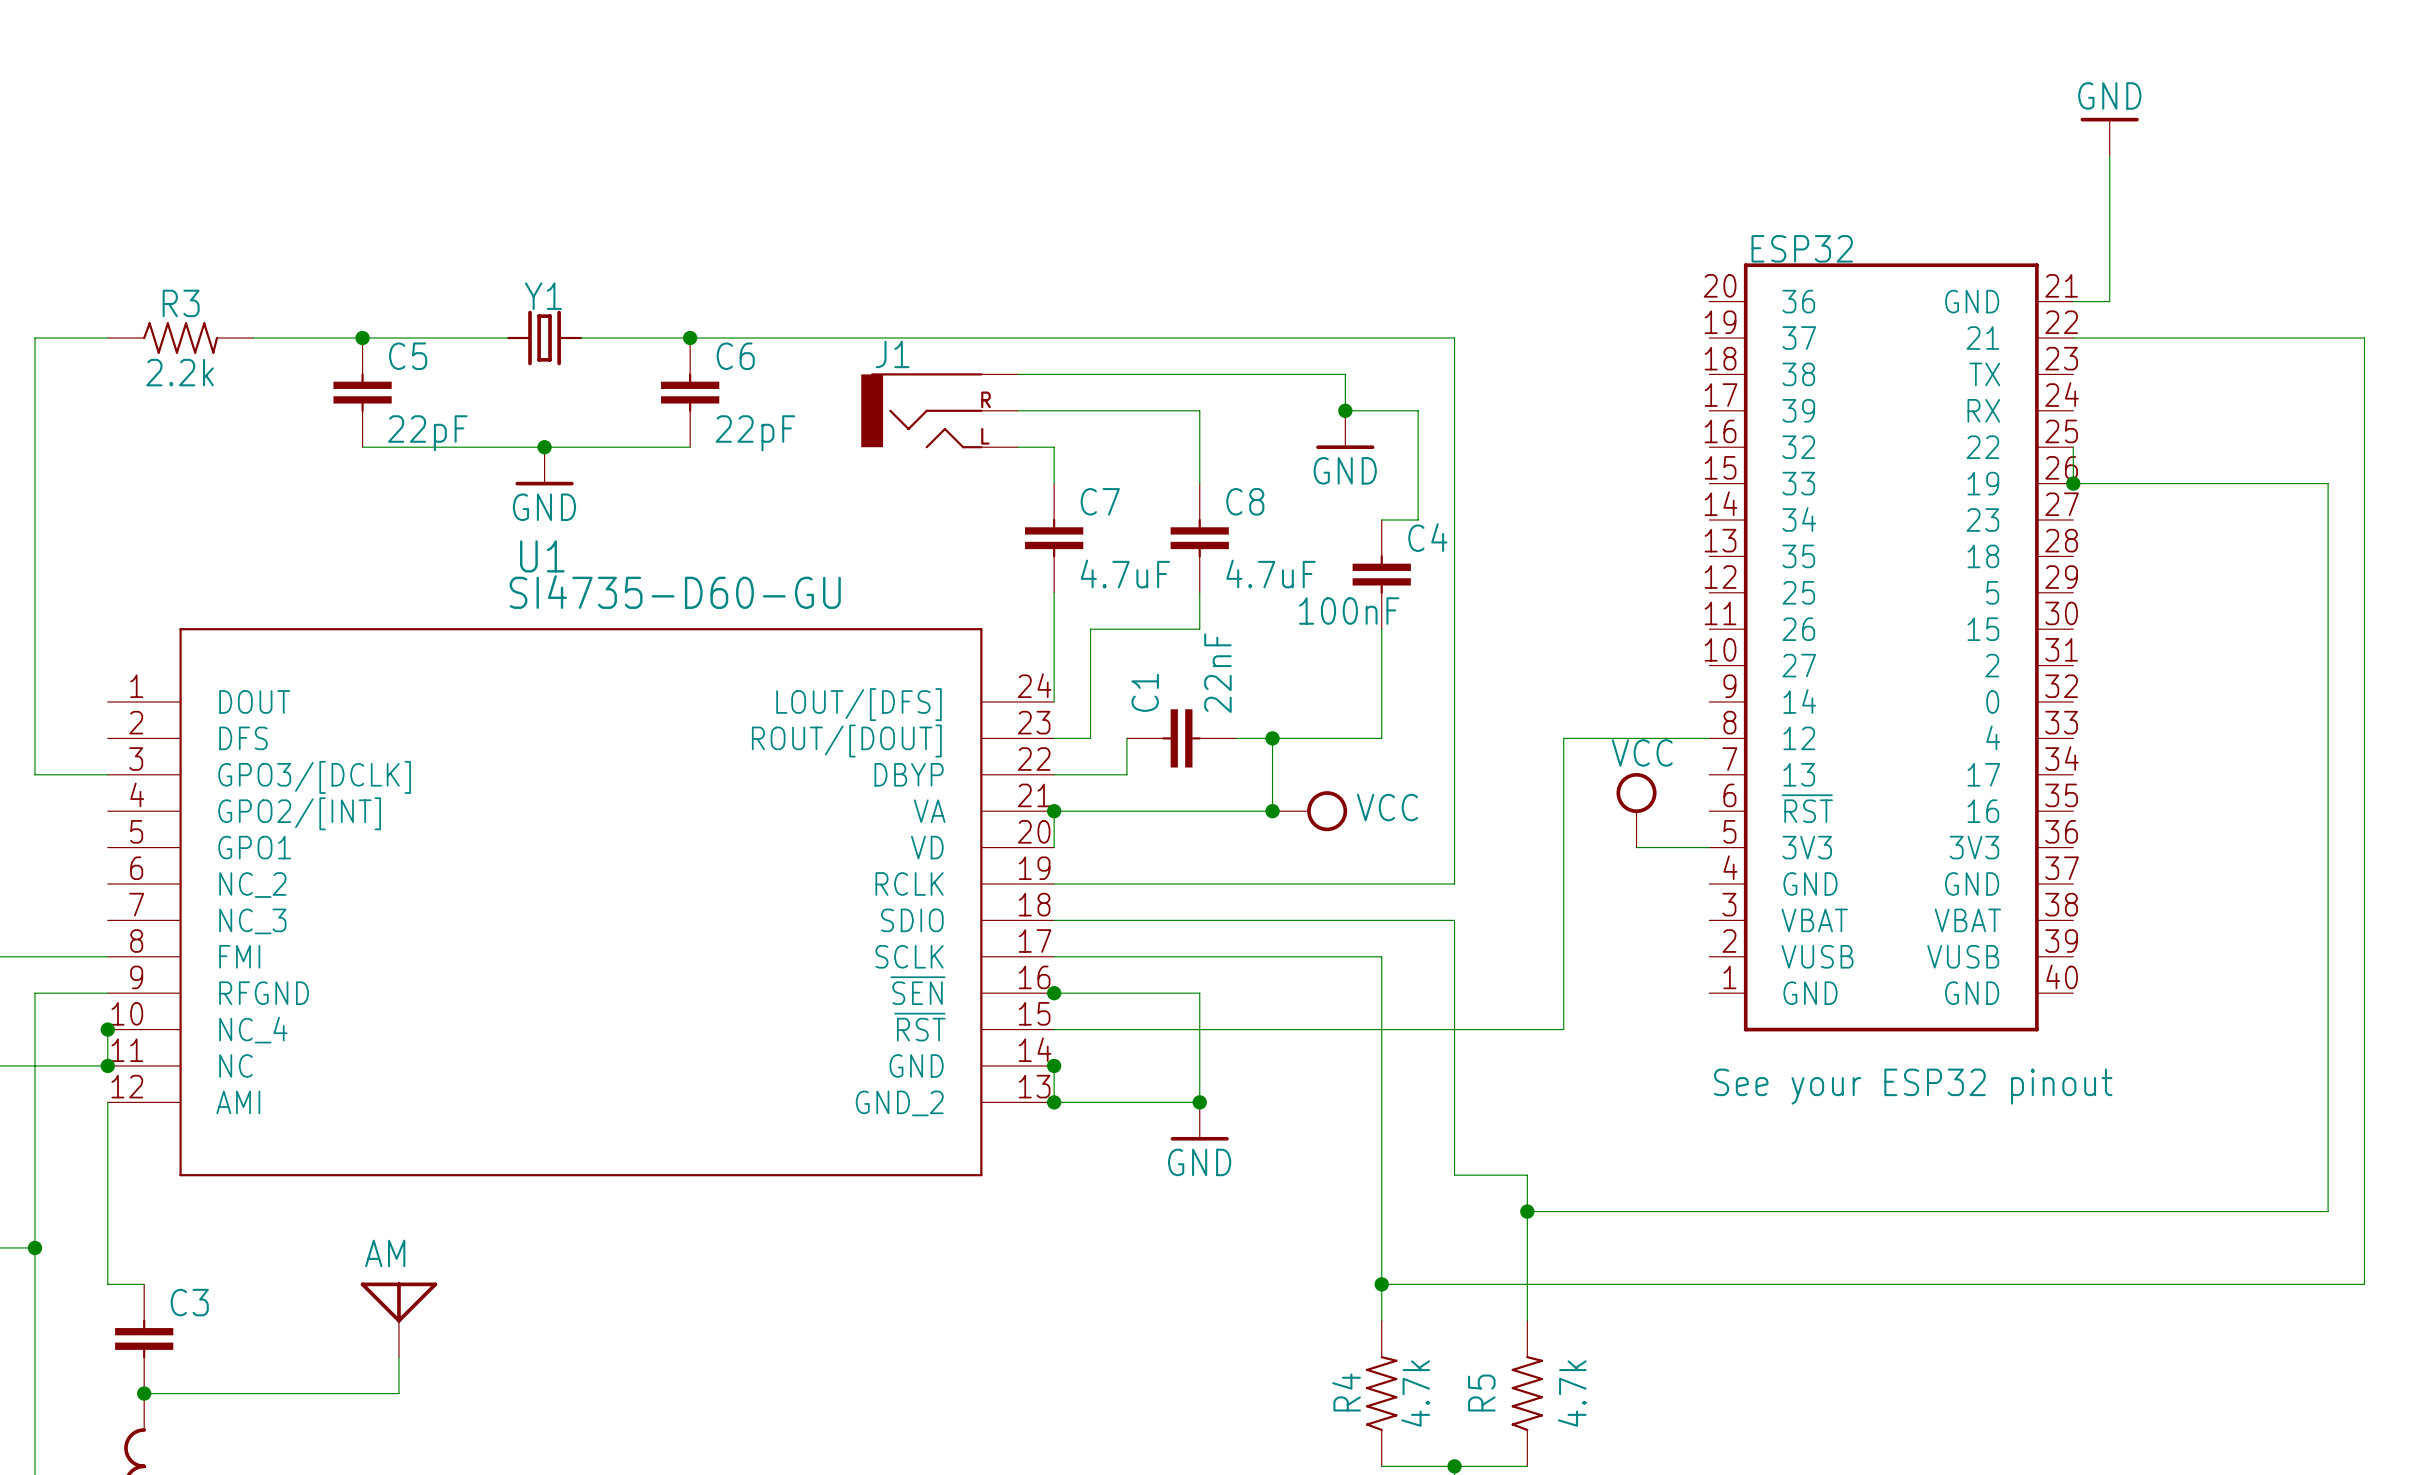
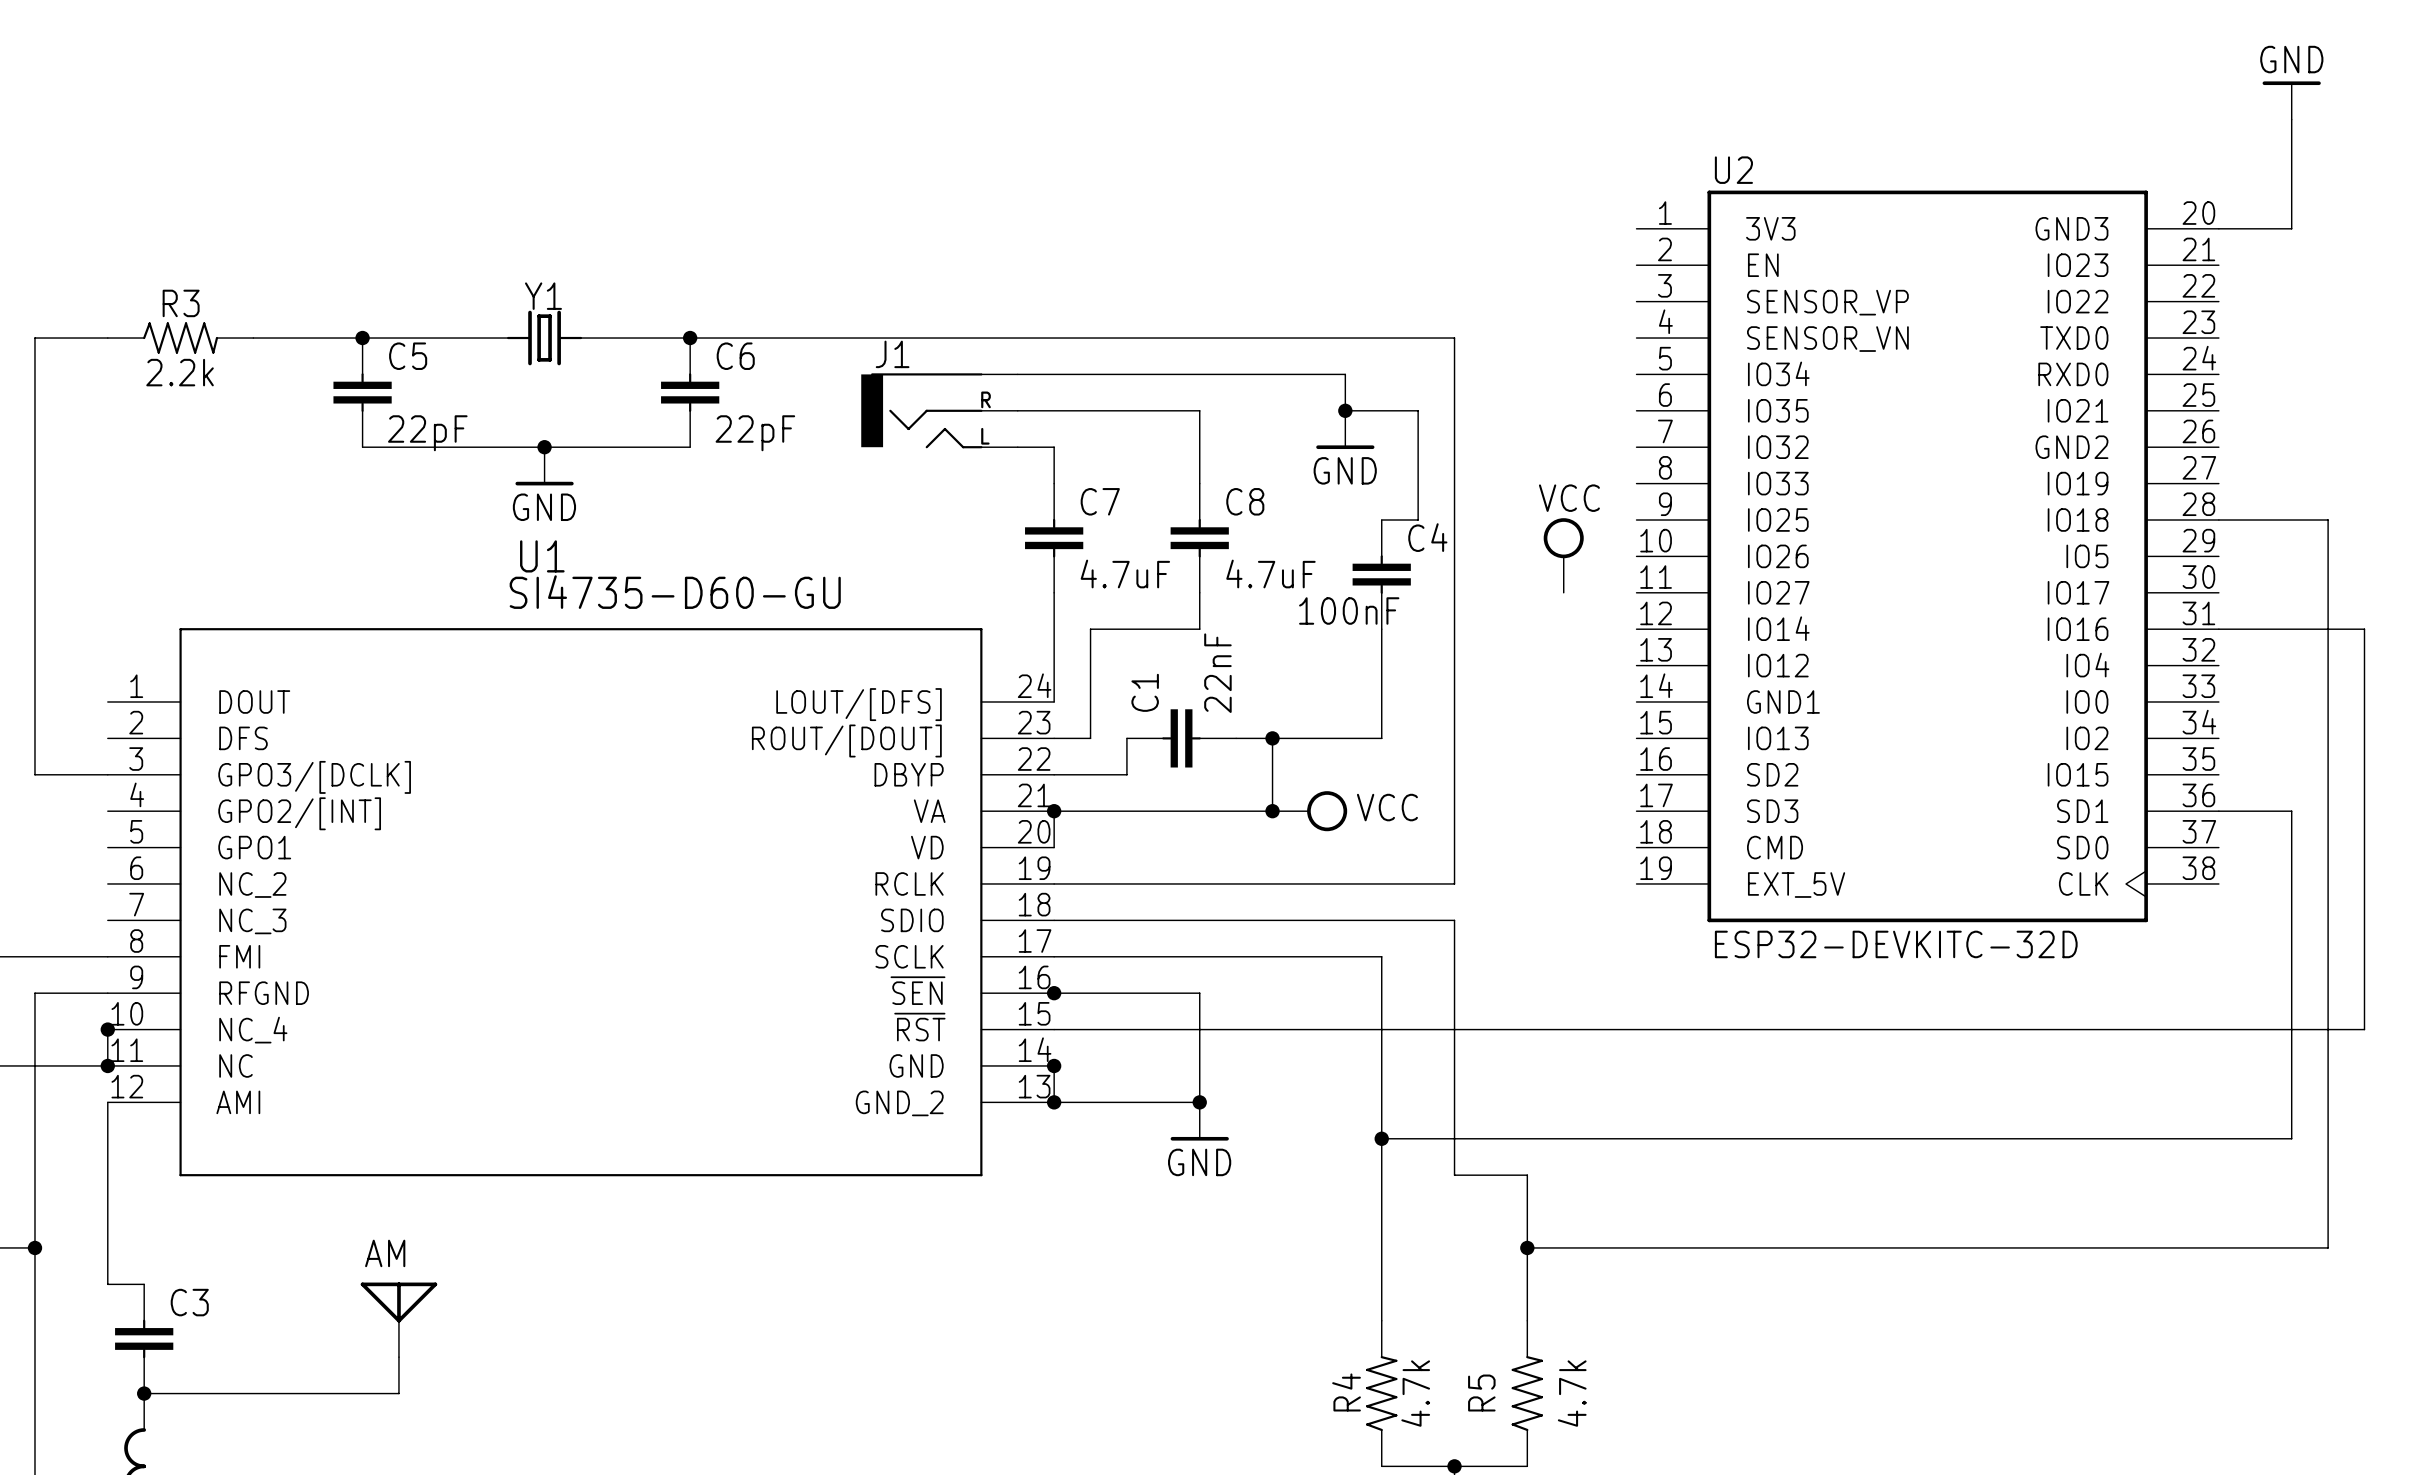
wire: none -> (2291, 119) (2291, 228) (2218, 228)
power symbol position: GND (2109, 136) -> GND (2291, 100)
wire: (2109, 156) (2109, 301) (2073, 301) -> none
wire: (2073, 338) (2364, 338) (2364, 629) -> (2218, 629) (2364, 629)
wire: (2073, 447) (2073, 483) (2328, 483) (2328, 520) -> (2218, 520) (2328, 520)
junction: (2073, 483) -> none
U2: none -> ESP32-DEVKITC-32D (1927, 556)
ESP32: See your ESP32 pinout (1891, 647) -> none
wire: (1709, 738) (1563, 738) (1563, 1029) -> none
power symbol position: VCC (1636, 810) -> VCC (1563, 555)
wire: none -> (2218, 811) (2291, 811) (2291, 1138) (1381, 1138)
wire: (2364, 1029) (2364, 1284) (1381, 1284) -> (2364, 1029) (1563, 1029)
junction: none -> (1381, 1138)
wire: (1527, 1211) (2328, 1211) -> (1527, 1247) (2328, 1247) (2328, 1211)
junction position: (1527, 1211) -> (1527, 1247)
junction: (1381, 1284) -> none

